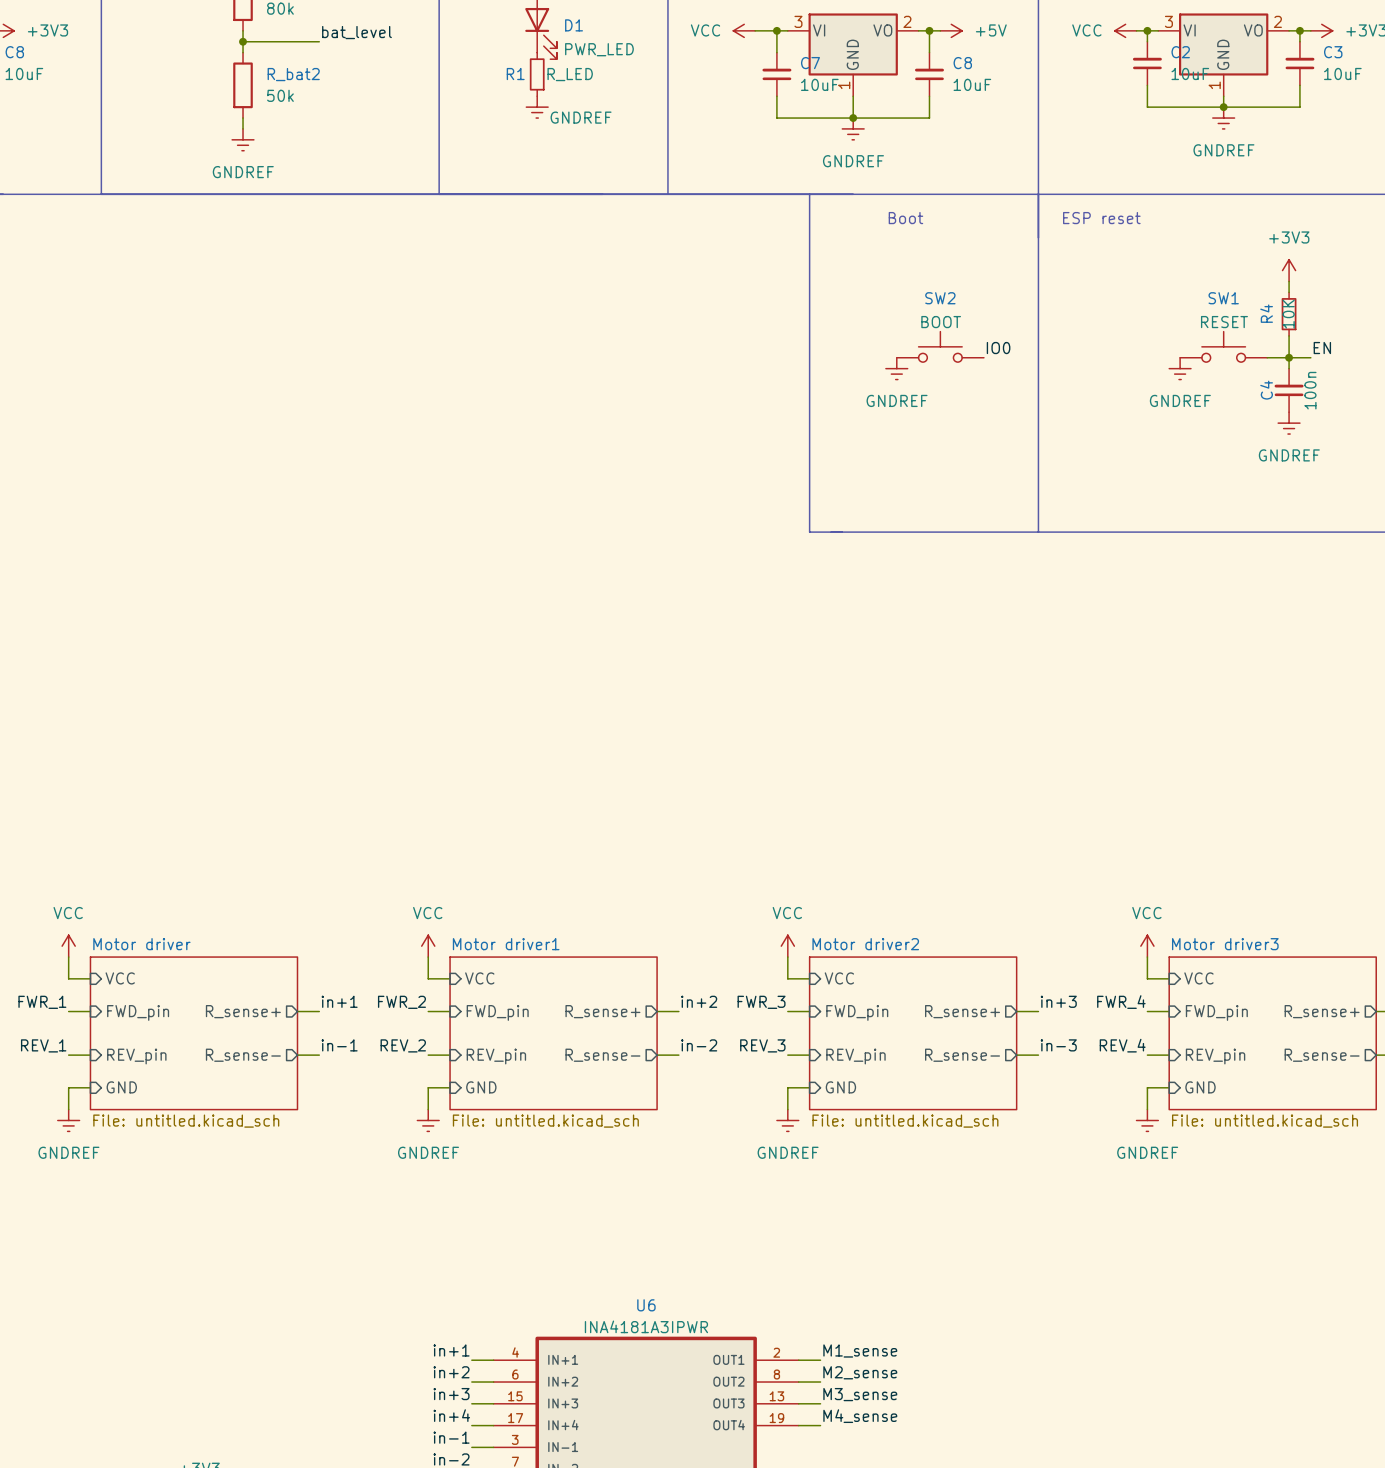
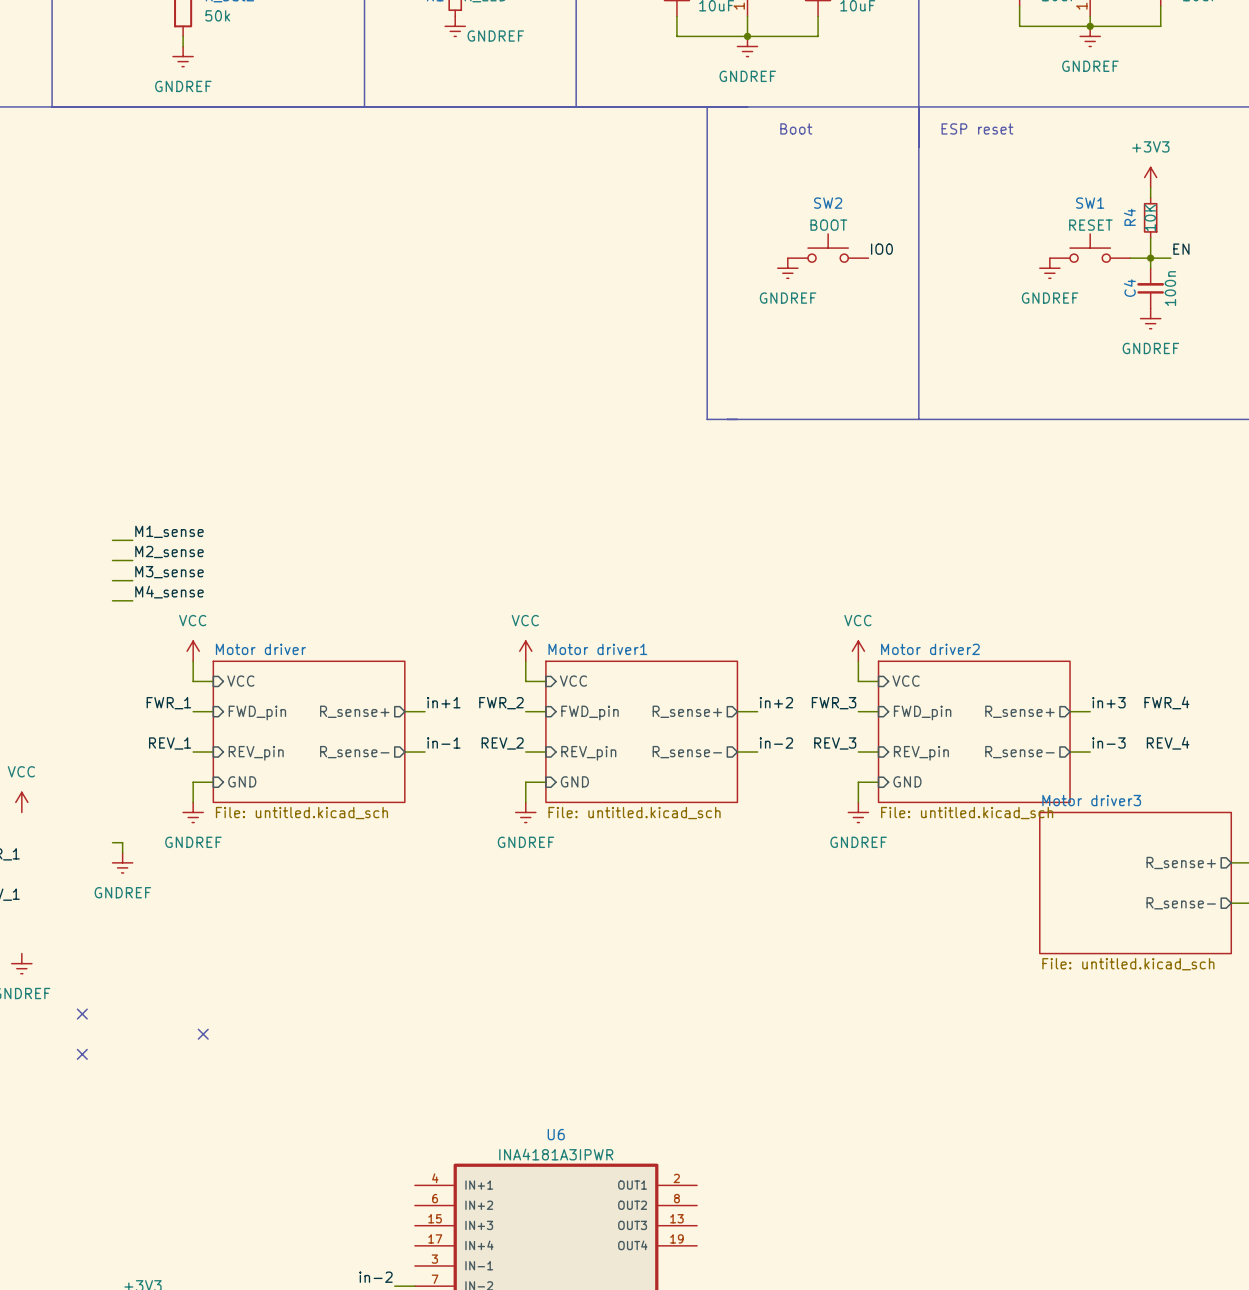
label: none -> M1_sense (169, 531)
wire: none -> (112, 540) (132, 540)
label: none -> M2_sense (169, 551)
wire: none -> (112, 560) (132, 560)
label: none -> M3_sense (169, 572)
wire: none -> (112, 580) (132, 580)
label: none -> M4_sense (169, 592)
wire: none -> (112, 600) (132, 600)
power symbol: none -> VCC (193, 651)
power symbol: none -> VCC (525, 651)
power symbol: none -> VCC (858, 651)
wire: none -> (193, 661) (193, 681) (213, 681)
wire: none -> (525, 661) (525, 681) (545, 681)
wire: none -> (858, 661) (858, 681) (878, 681)
sheet pin: none -> VCC (240, 681)
sheet pin: none -> VCC (573, 681)
sheet pin: none -> VCC (906, 681)
label: none -> FWR_1 (168, 703)
label: none -> in+1 (443, 702)
label: none -> FWR_2 (501, 703)
label: none -> in+2 (776, 702)
label: none -> FWR_3 (834, 703)
label: none -> in+3 (1108, 702)
label: none -> FWR_4 (1166, 702)
sheet pin: none -> R_sense+ (354, 711)
sheet pin: none -> R_sense+ (687, 711)
sheet pin: none -> R_sense+ (1019, 711)
sheet pin: none -> FWD_pin (257, 712)
sheet pin: none -> FWD_pin (590, 712)
sheet pin: none -> FWD_pin (922, 712)
sheet Motor driver: none -> File: untitled.kicad_sch (309, 731)
label: none -> in-1 (443, 743)
label: none -> in-2 (776, 743)
label: none -> in-3 (1108, 743)
label: none -> REV_1 (170, 743)
label: none -> REV_2 (502, 743)
label: none -> REV_3 (835, 743)
label: none -> REV_4 (1168, 743)
sheet pin: none -> R_sense- (354, 752)
sheet pin: none -> R_sense- (687, 752)
sheet pin: none -> R_sense- (1019, 752)
sheet pin: none -> REV_pin (256, 753)
sheet pin: none -> REV_pin (588, 753)
sheet pin: none -> REV_pin (921, 753)
sheet pin: none -> GND (242, 781)
sheet pin: none -> GND (574, 781)
sheet pin: none -> GND (907, 781)
wire: none -> (213, 782) (193, 782) (193, 802)
wire: none -> (545, 782) (525, 782) (525, 802)
wire: none -> (878, 782) (858, 782) (858, 802)
power symbol: VCC (428, 946) -> none
power symbol: VCC (787, 946) -> none
power symbol: VCC (1147, 946) -> none
wire: (68, 957) (68, 978) (90, 978) -> none
power symbol: none -> GNDREF (193, 812)
wire: (428, 957) (428, 978) (450, 978) -> none
power symbol: none -> GNDREF (525, 812)
wire: (787, 957) (787, 978) (809, 978) -> none
power symbol: none -> GNDREF (858, 812)
wire: (1147, 957) (1147, 978) (1169, 978) -> none
sheet pin: VCC (120, 978) -> none
sheet pin: VCC (479, 978) -> none
sheet pin: VCC (839, 978) -> none
sheet pin: VCC (1198, 978) -> none
wire: none -> (112, 842) (122, 842) (122, 852)
label: in+1 (339, 1001) -> none
label: in+2 (699, 1001) -> none
label: in+3 (1058, 1001) -> none
label: FWR_2 (401, 1002) -> none
label: FWR_3 (761, 1002) -> none
label: FWR_4 (1121, 1002) -> none
wire: (68, 1011) (90, 1011) -> none
power symbol: none -> GNDREF (122, 862)
sheet pin: R_sense+ (243, 1011) -> none
wire: (297, 1011) (319, 1011) -> (193, 711) (213, 711)
wire: (428, 1011) (450, 1011) -> (404, 711) (424, 711)
sheet pin: R_sense+ (602, 1011) -> none
wire: (657, 1011) (678, 1011) -> (525, 711) (545, 711)
wire: (787, 1011) (809, 1011) -> (737, 711) (757, 711)
sheet pin: R_sense+ (962, 1011) -> none
wire: (1016, 1011) (1038, 1011) -> (858, 711) (878, 711)
wire: (1147, 1011) (1169, 1011) -> (1070, 711) (1090, 711)
sheet pin: FWD_pin (138, 1012) -> none
sheet pin: FWD_pin (497, 1012) -> none
sheet pin: FWD_pin (857, 1012) -> none
sheet pin: FWD_pin (1216, 1012) -> none
sheet Motor driver: File: untitled.kicad_sch (193, 1033) -> none
sheet Motor driver1 position: (553, 1033) -> (641, 731)
sheet Motor driver2 position: (913, 1033) -> (974, 731)
label: in-1 (339, 1045) -> none
label: REV_2 (403, 1045) -> none
label: in-2 (699, 1045) -> none
label: REV_3 (762, 1045) -> none
label: in-3 (1058, 1045) -> none
label: REV_4 (1122, 1045) -> none
wire: (68, 1055) (90, 1055) -> none
sheet pin: R_sense- (243, 1055) -> none
wire: (297, 1055) (319, 1055) -> (193, 752) (213, 752)
wire: (428, 1055) (450, 1055) -> (404, 752) (424, 752)
sheet pin: R_sense- (602, 1055) -> none
wire: (657, 1055) (678, 1055) -> (525, 752) (545, 752)
wire: (787, 1055) (809, 1055) -> (737, 752) (757, 752)
sheet pin: R_sense- (962, 1055) -> none
wire: (1016, 1055) (1038, 1055) -> (858, 752) (878, 752)
wire: (1147, 1055) (1169, 1055) -> (1070, 752) (1090, 752)
sheet pin: REV_pin (136, 1056) -> none
sheet pin: REV_pin (496, 1056) -> none
sheet pin: REV_pin (855, 1056) -> none
sheet pin: REV_pin (1215, 1056) -> none
wire: (90, 1087) (68, 1087) (68, 1109) -> none
sheet pin: GND (121, 1087) -> none
wire: (450, 1087) (428, 1087) (428, 1109) -> none
sheet pin: GND (481, 1087) -> none
wire: (809, 1087) (787, 1087) (787, 1109) -> none
sheet pin: GND (840, 1087) -> none
wire: (1169, 1087) (1147, 1087) (1147, 1109) -> none
sheet pin: GND (1200, 1087) -> none
power symbol: GNDREF (428, 1120) -> none
power symbol: GNDREF (787, 1120) -> none
power symbol: GNDREF (1147, 1120) -> none
no-connect mark: none -> (82, 1014)
no-connect mark: none -> (203, 1034)
no-connect mark: none -> (82, 1054)
label: in+1 (451, 1350) -> none
label: M1_sense (860, 1351) -> none
wire: (471, 1360) (493, 1360) -> none
wire: (798, 1360) (820, 1360) -> none
label: in+2 (451, 1372) -> none
label: M2_sense (860, 1372) -> none
wire: (471, 1382) (493, 1382) -> none
wire: (798, 1382) (820, 1382) -> none
label: in+3 (451, 1394) -> none
label: M3_sense (860, 1394) -> none
wire: (471, 1403) (493, 1403) -> none
wire: (798, 1403) (820, 1403) -> none
label: in+4 (451, 1415) -> none
label: M4_sense (860, 1416) -> none
wire: (471, 1425) (493, 1425) -> none
wire: (798, 1425) (820, 1425) -> none
label: in-1 (451, 1437) -> none
wire: (471, 1447) (493, 1447) -> none

